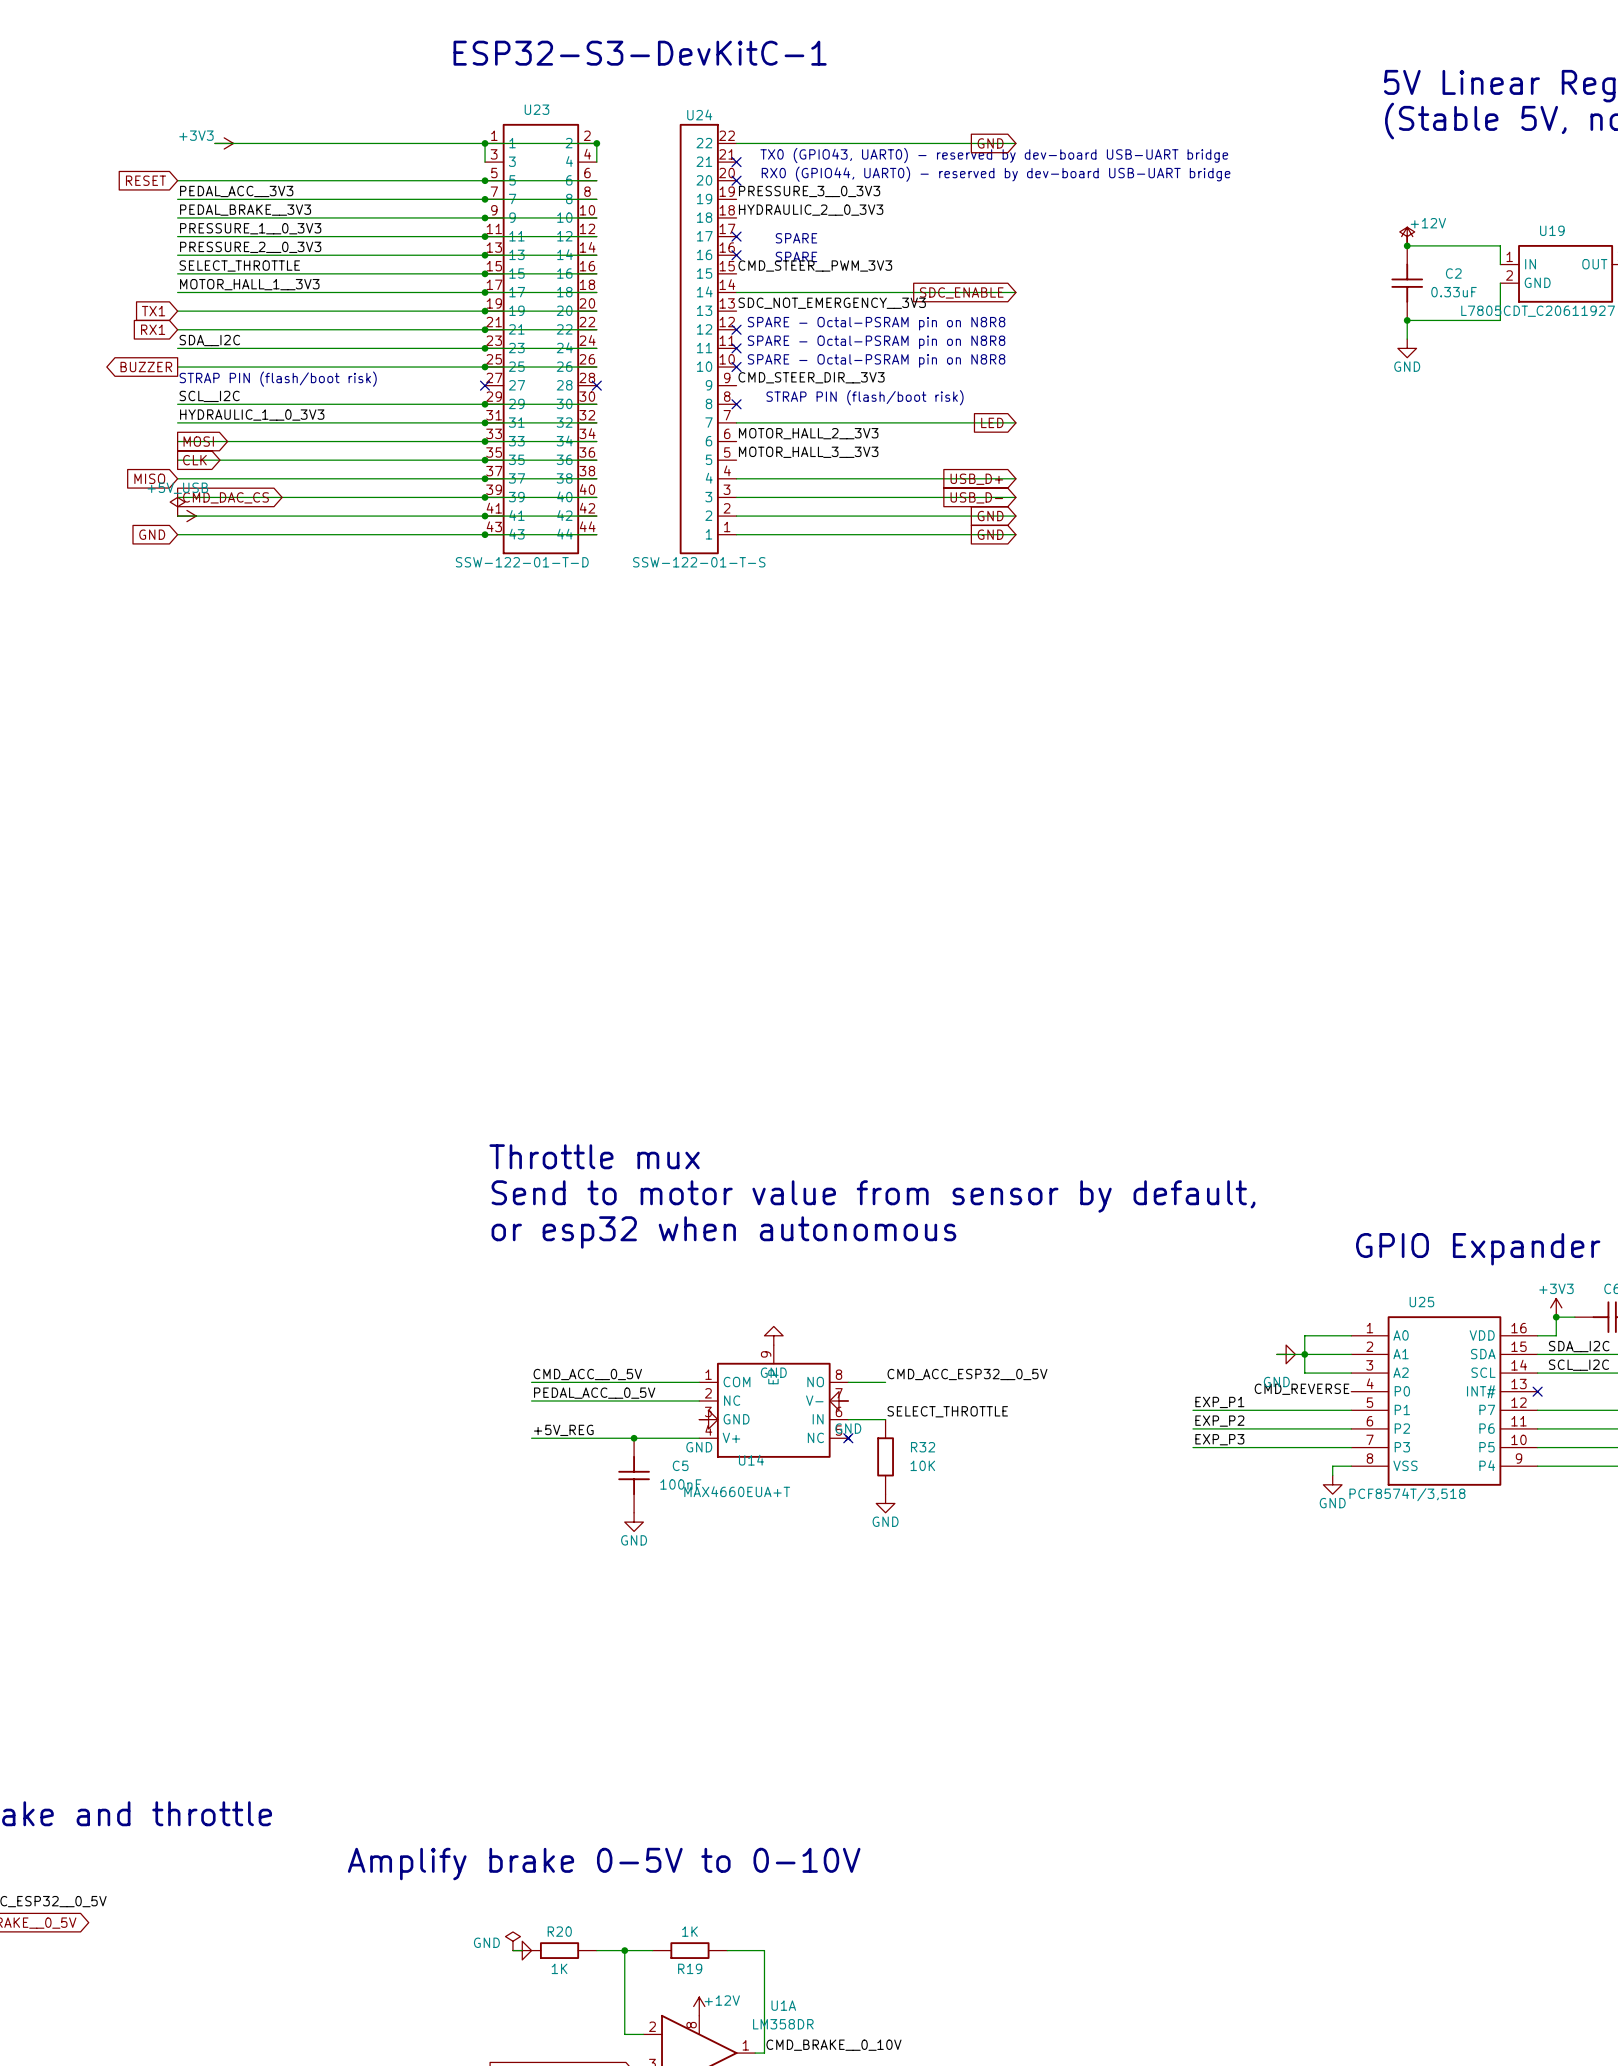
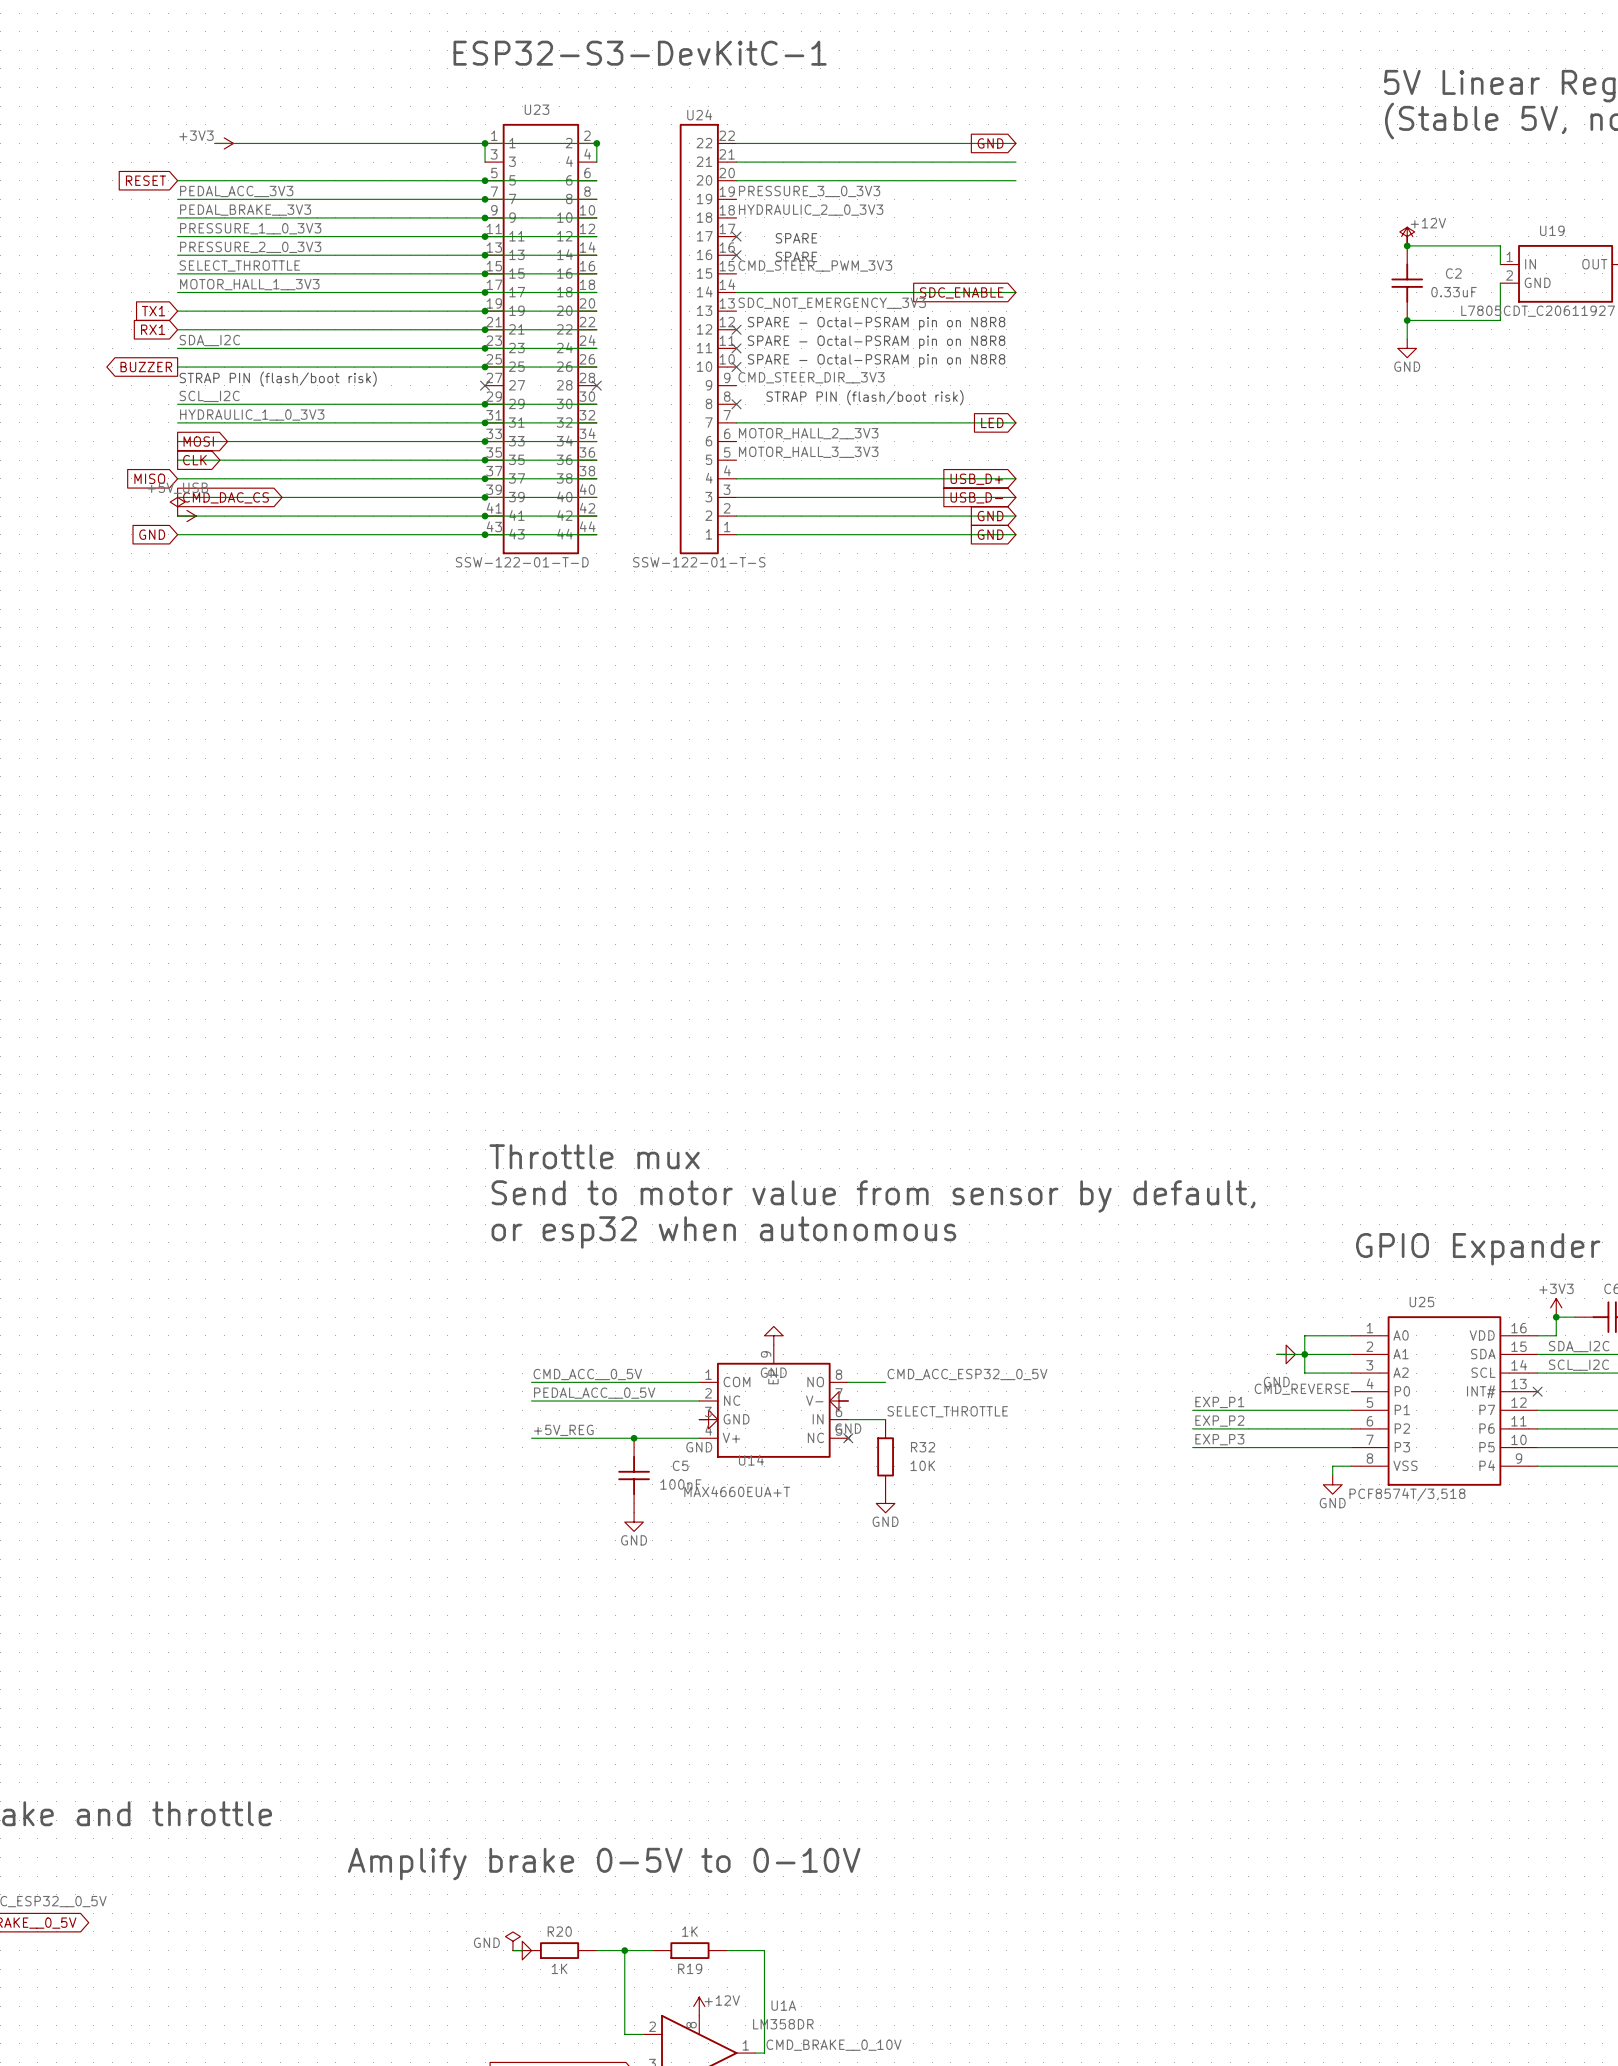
text: TX0 (GPIO43, UART0) - reserved by dev-board USB-UART bridge (994, 155) -> none
wire: none -> (736, 162) (1015, 162)
no-connect mark: (736, 162) -> none
text: RX0 (GPIO44, UART0) - reserved by dev-board USB-UART bridge (996, 174) -> none
wire: none -> (736, 180) (1015, 180)
no-connect mark: (736, 180) -> none

